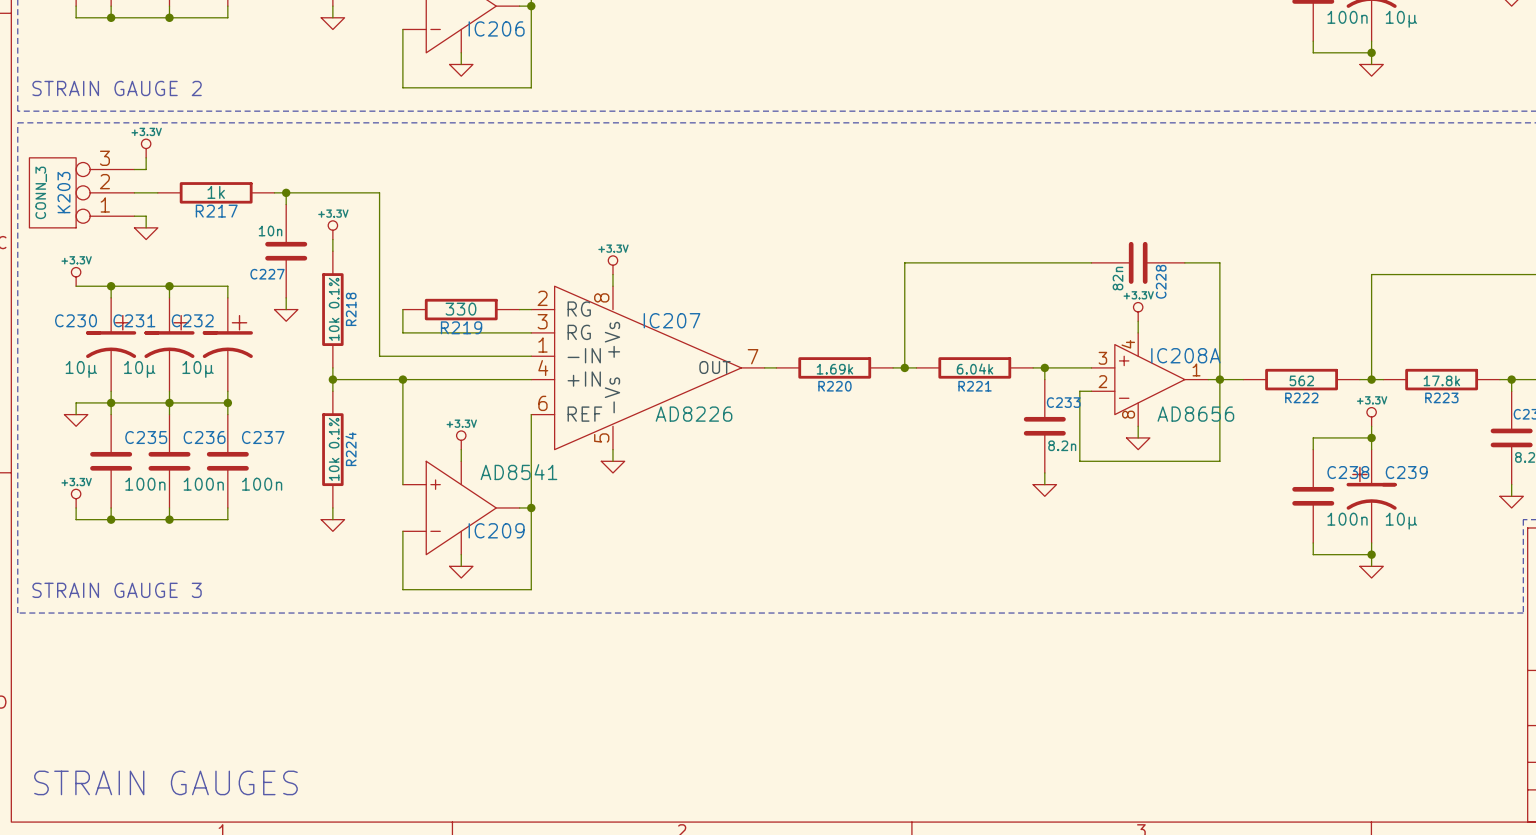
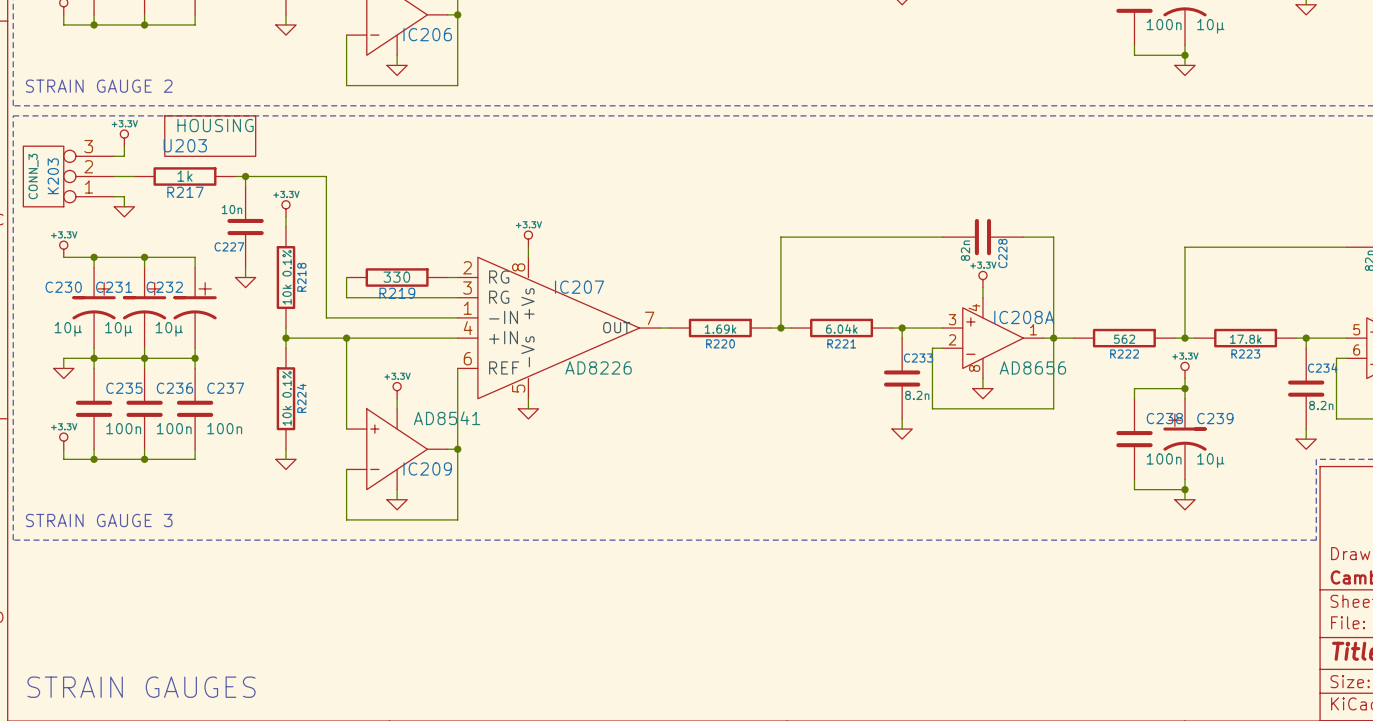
U203: none -> HOUSING (210, 136)

